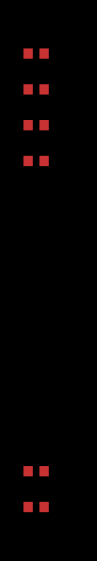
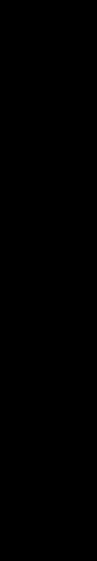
part: (36, 53) -> none
part: (36, 89) -> none
part: (36, 125) -> none
part: (36, 160) -> none
part: (36, 471) -> none
part: (36, 507) -> none

